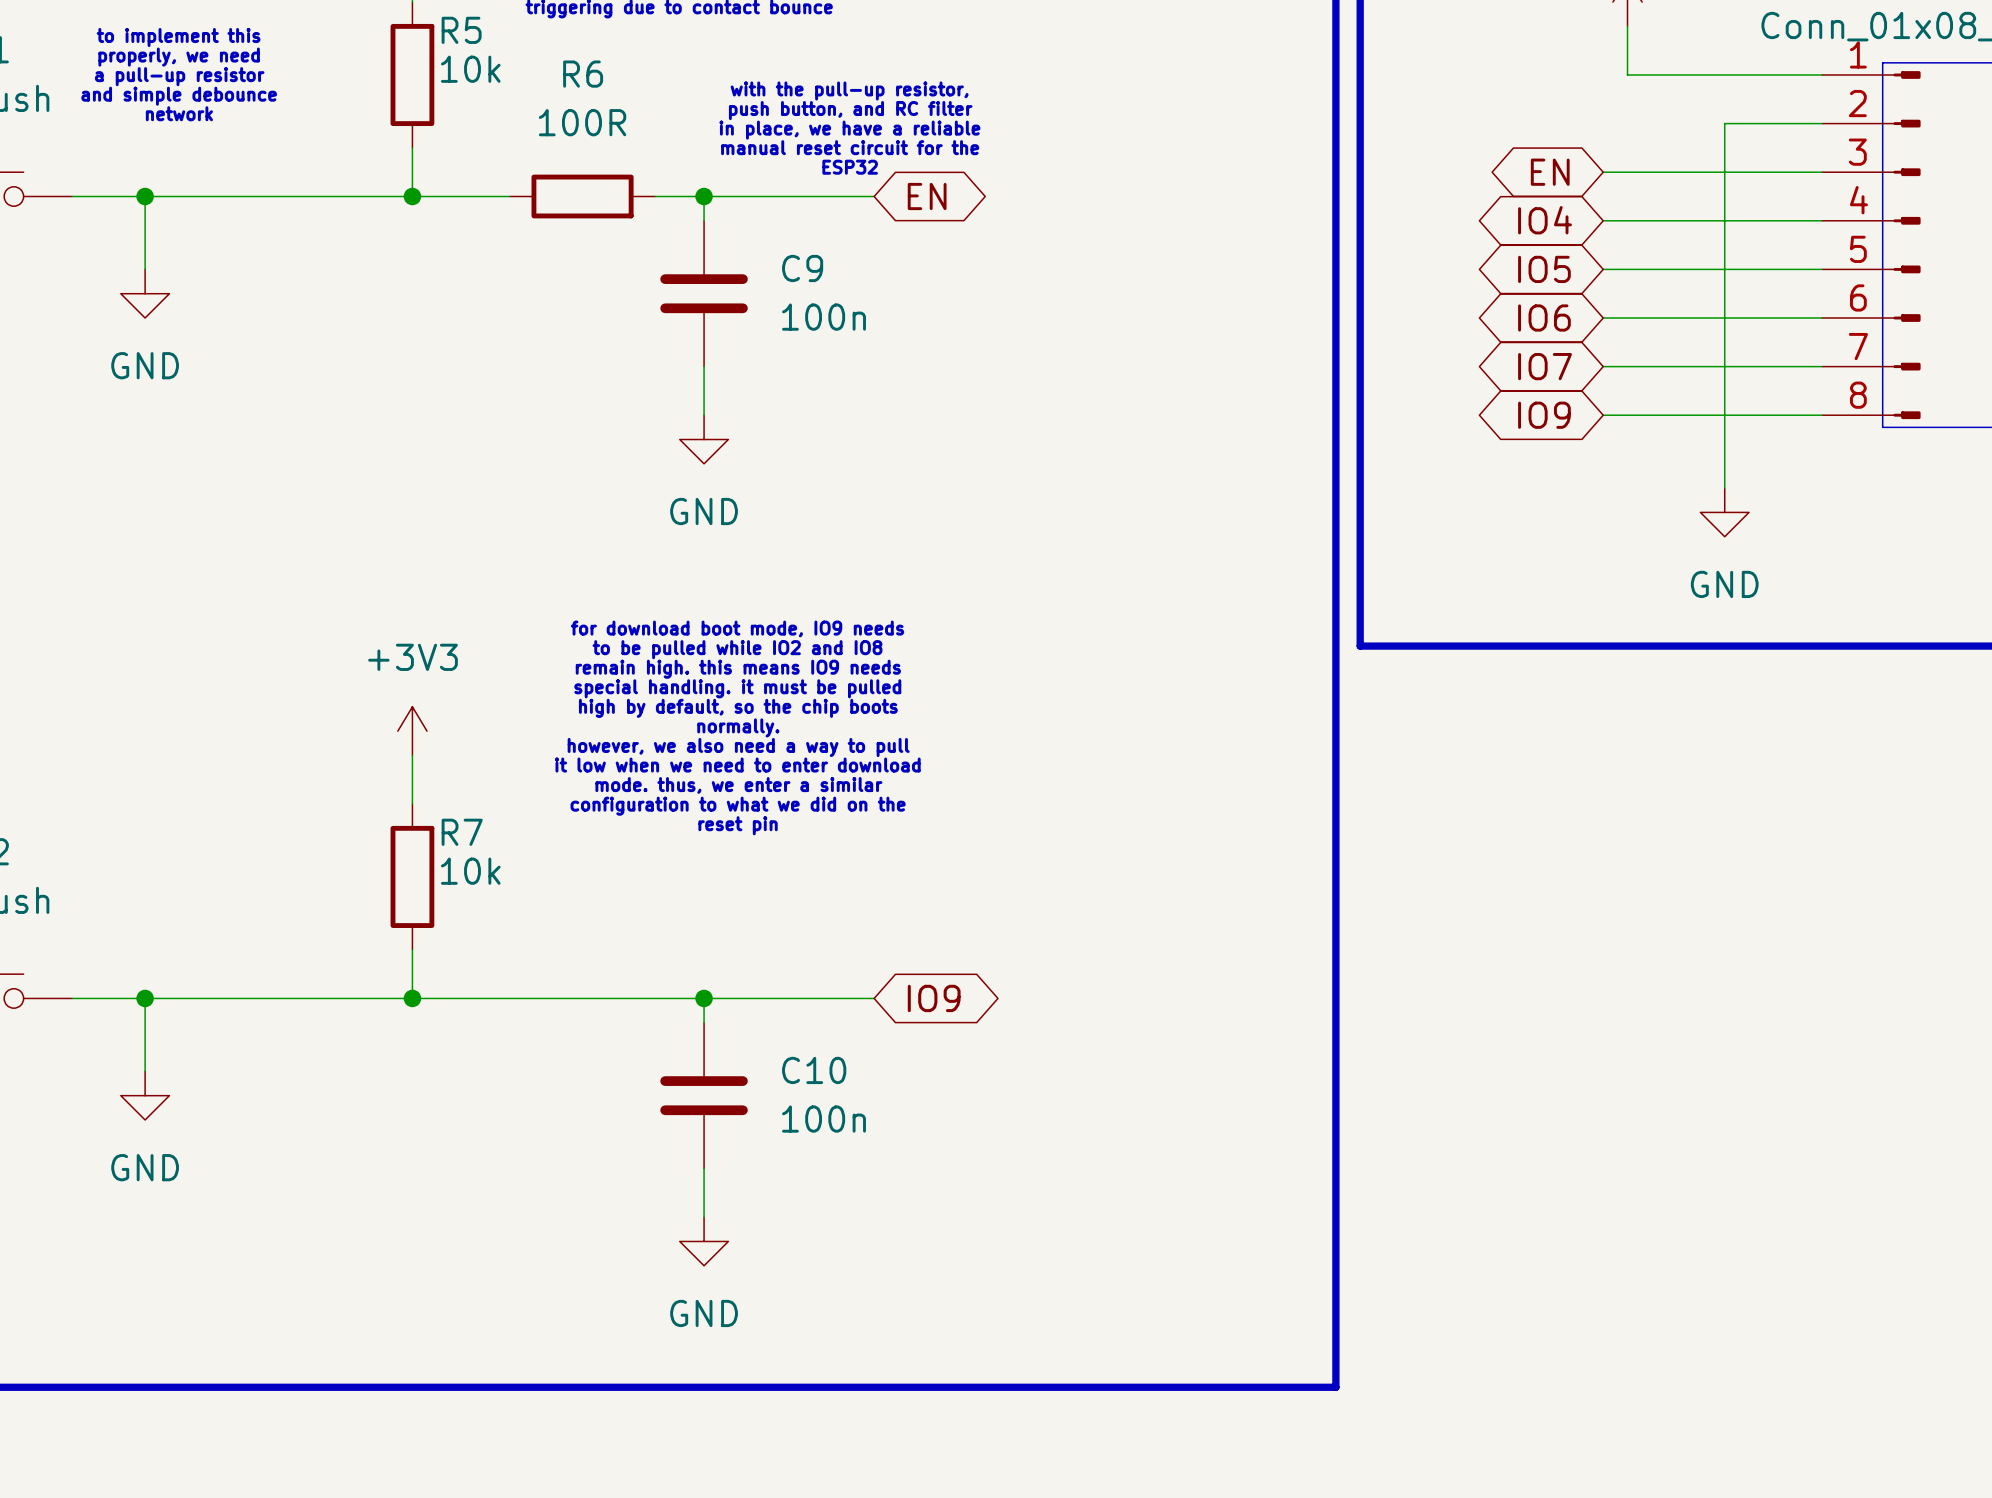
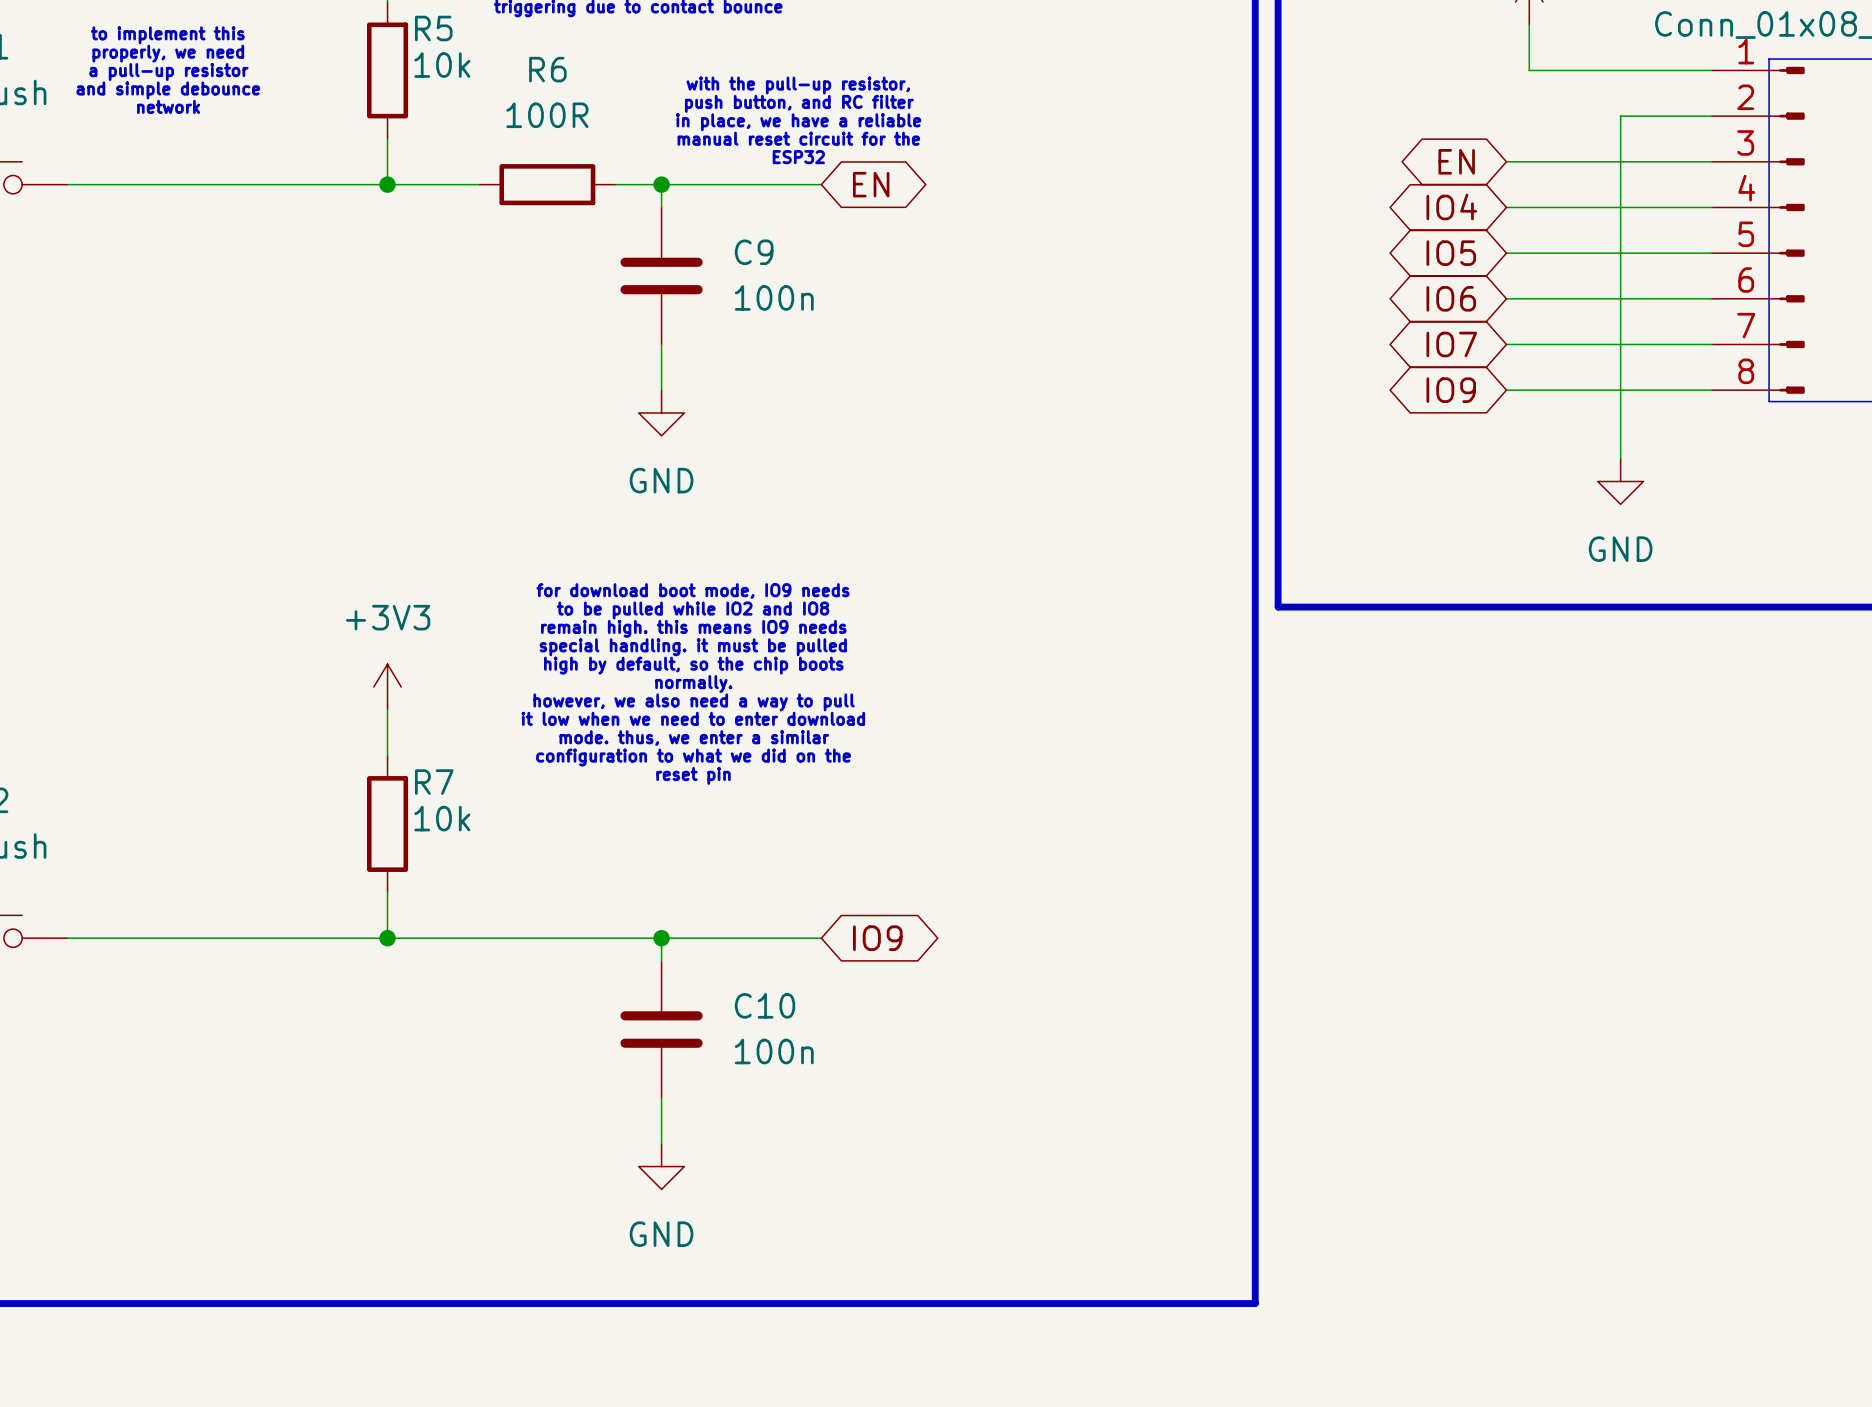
wire: (145, 196) (145, 269) -> none
junction: (145, 196) -> none
power symbol: GND (145, 293) -> none
wire: (145, 998) (145, 1071) -> none
junction: (145, 998) -> none
power symbol: GND (145, 1095) -> none

